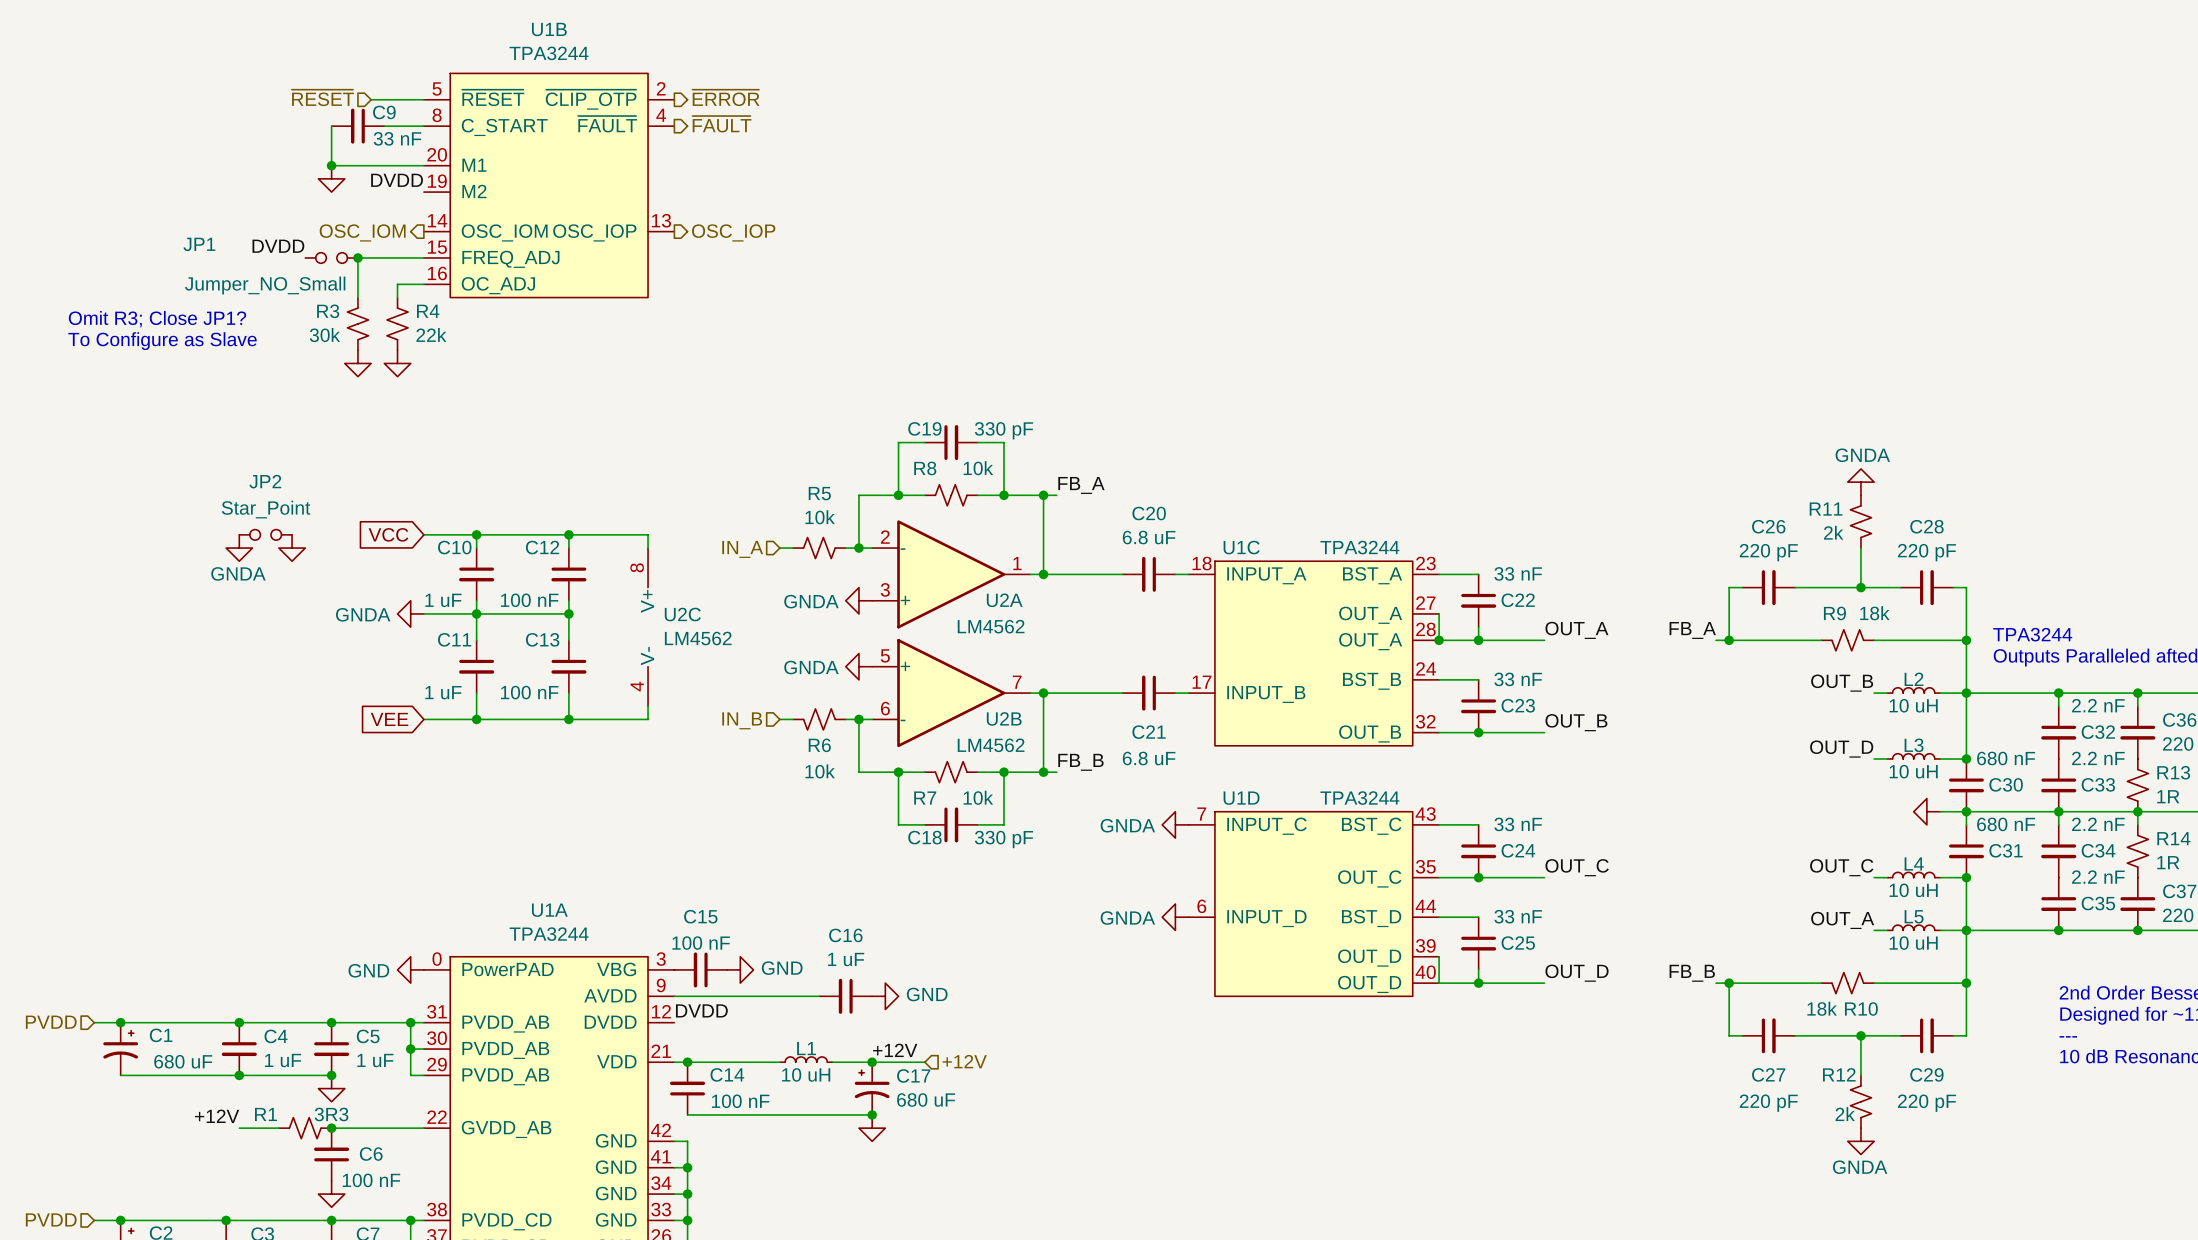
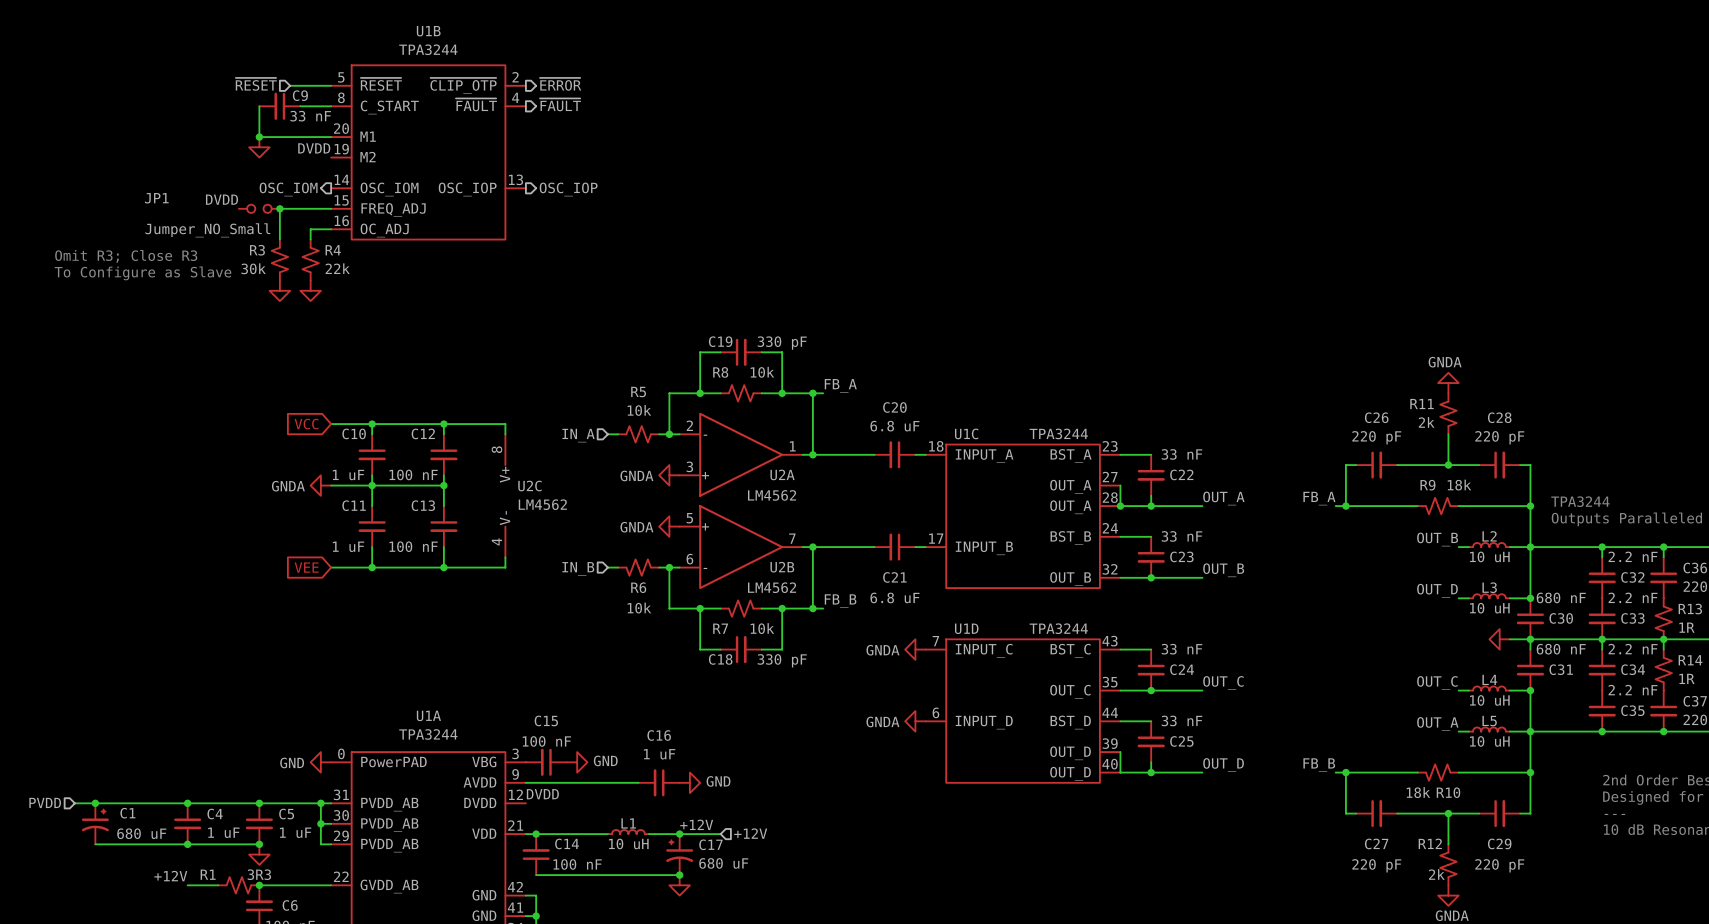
text: Omit R3; Close JP1? (157, 319) -> Omit R3; Close R3 (126, 256)
JP2: Star_Point (265, 534) -> none
power symbol: GNDA (239, 548) -> none
power symbol: (292, 548) -> none

